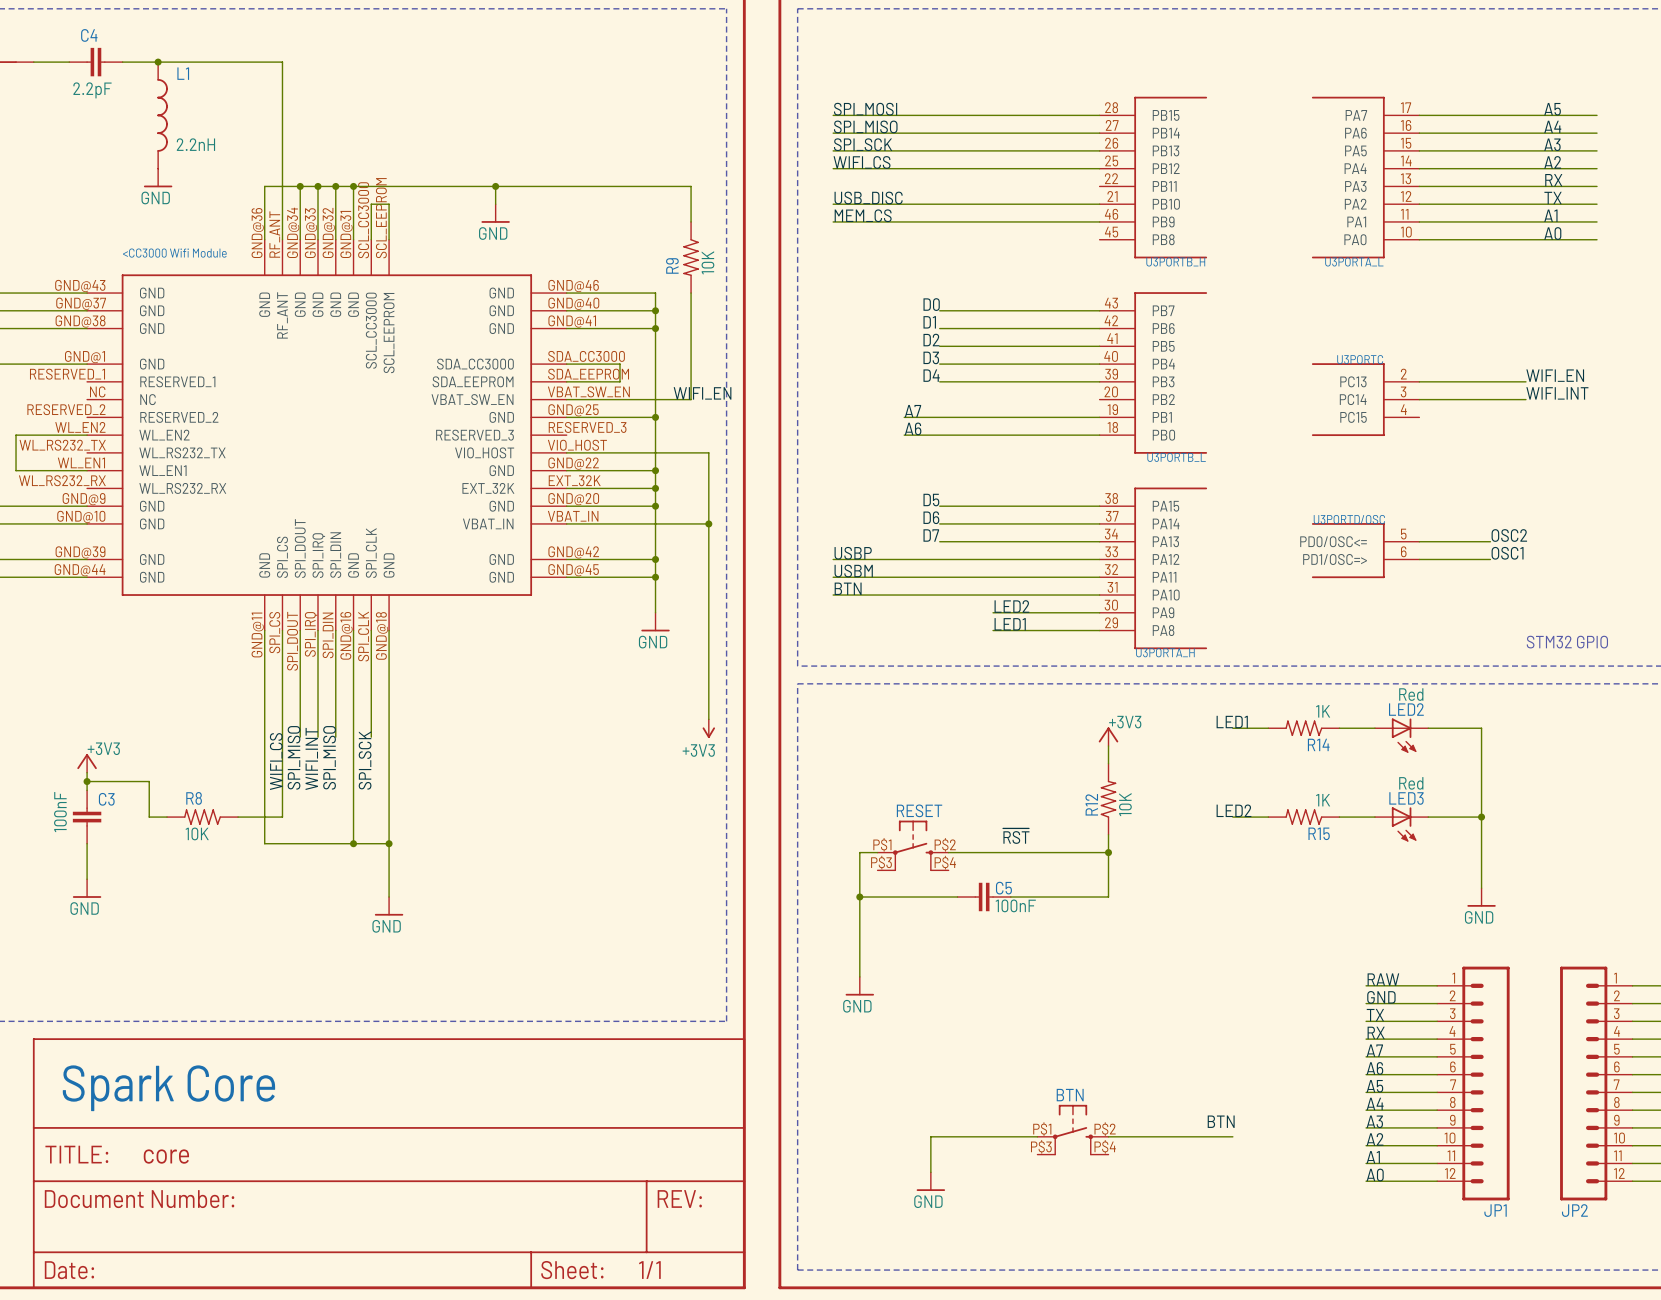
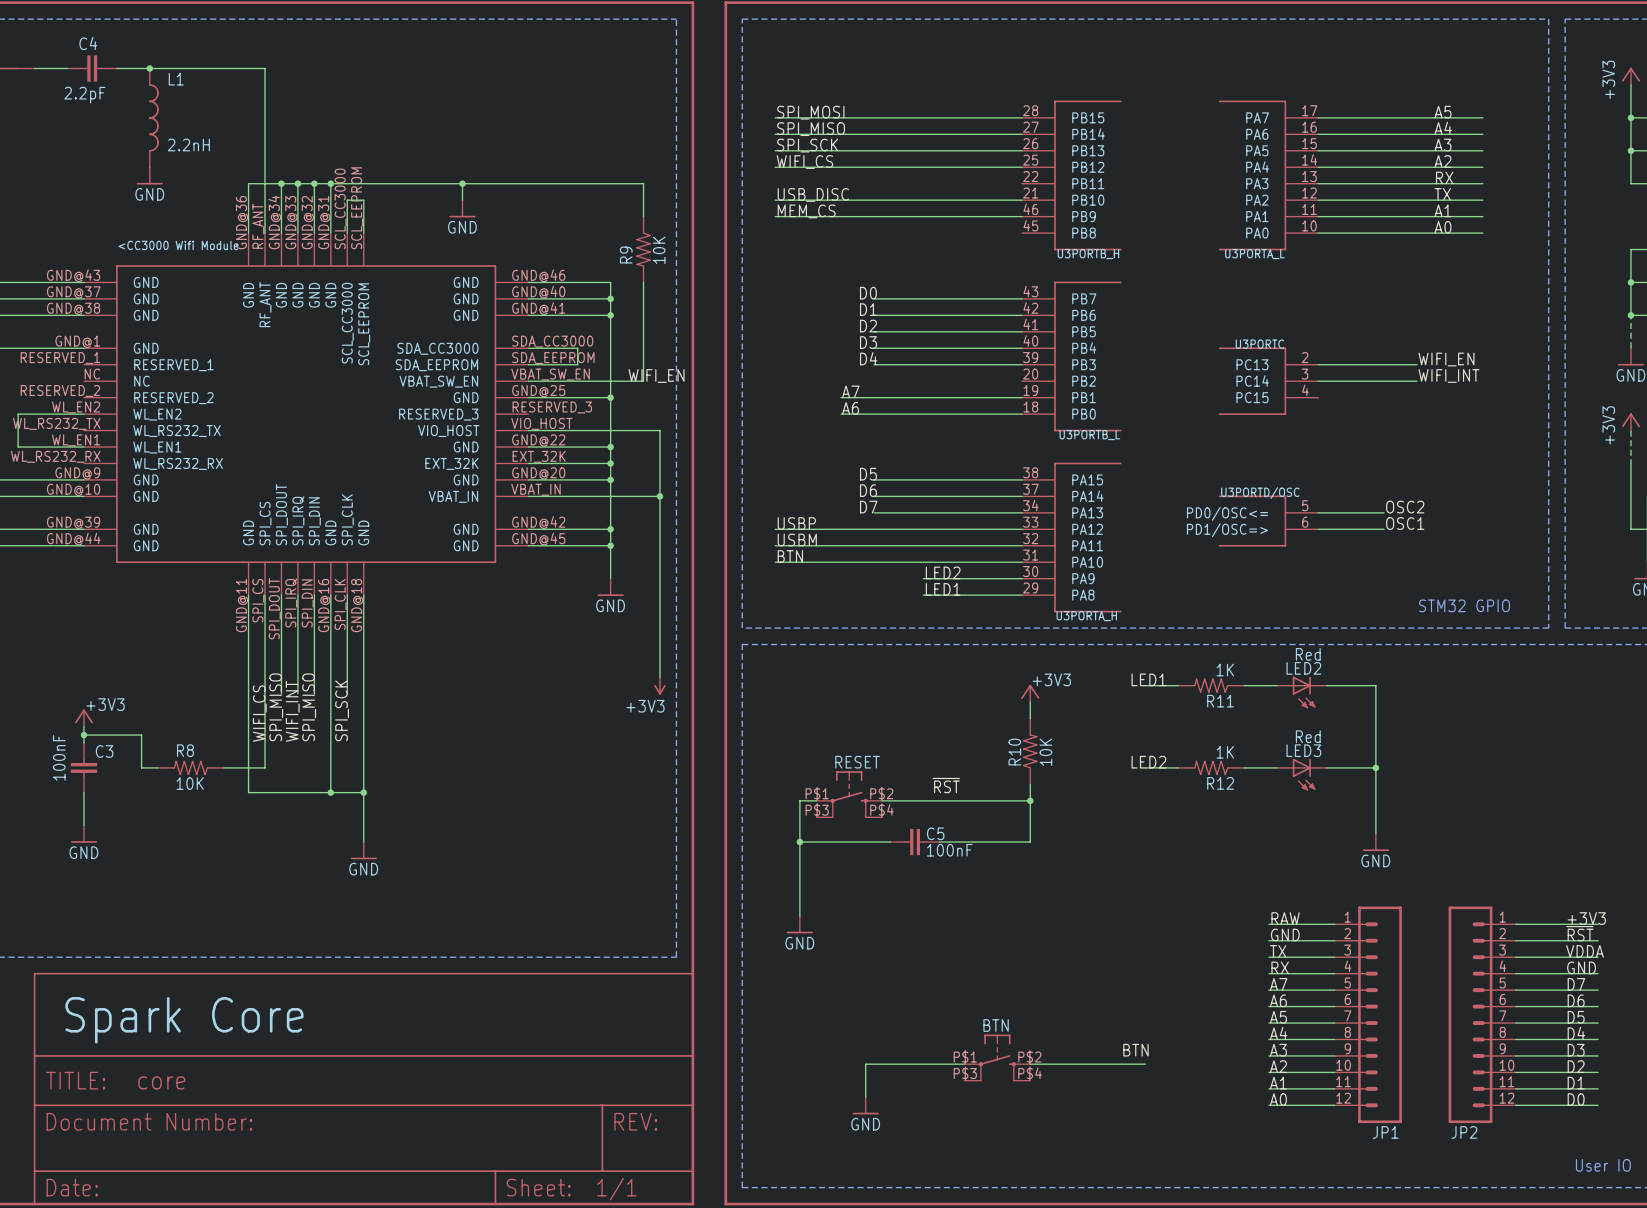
R14 name: R14 (1318, 744) -> R11 (1220, 701)
R12 name: R12 (1091, 804) -> R10 (1014, 752)
R15 name: R15 (1319, 833) -> R12 (1220, 783)

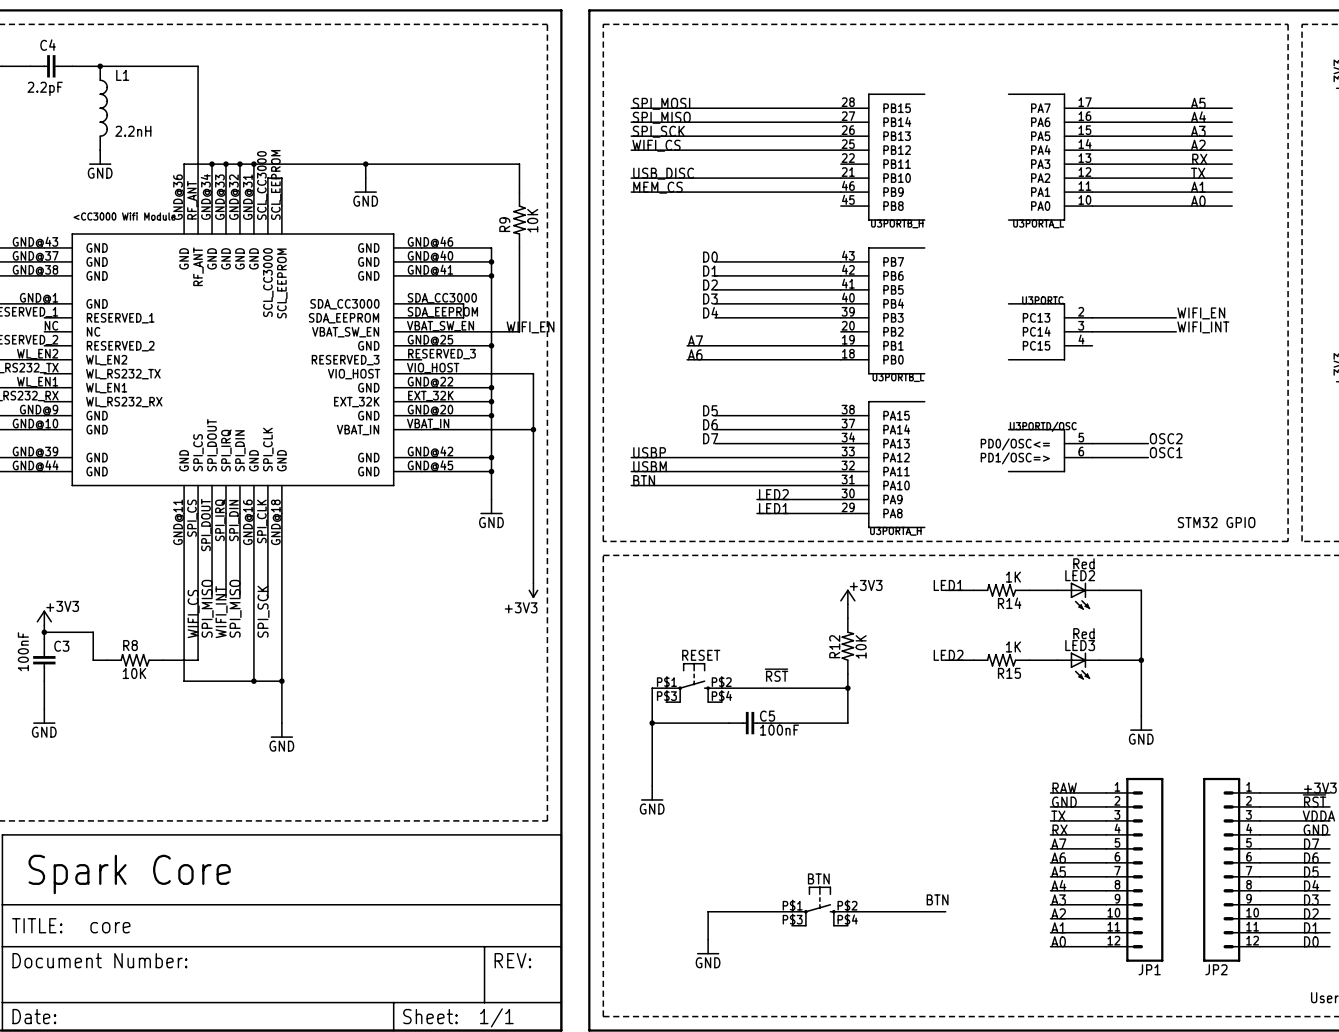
R11 name: R11 (1220, 701) -> R14 (1009, 603)
R10 name: R10 (1014, 752) -> R12 (834, 646)
R12 name: R12 (1220, 783) -> R15 (1009, 673)

